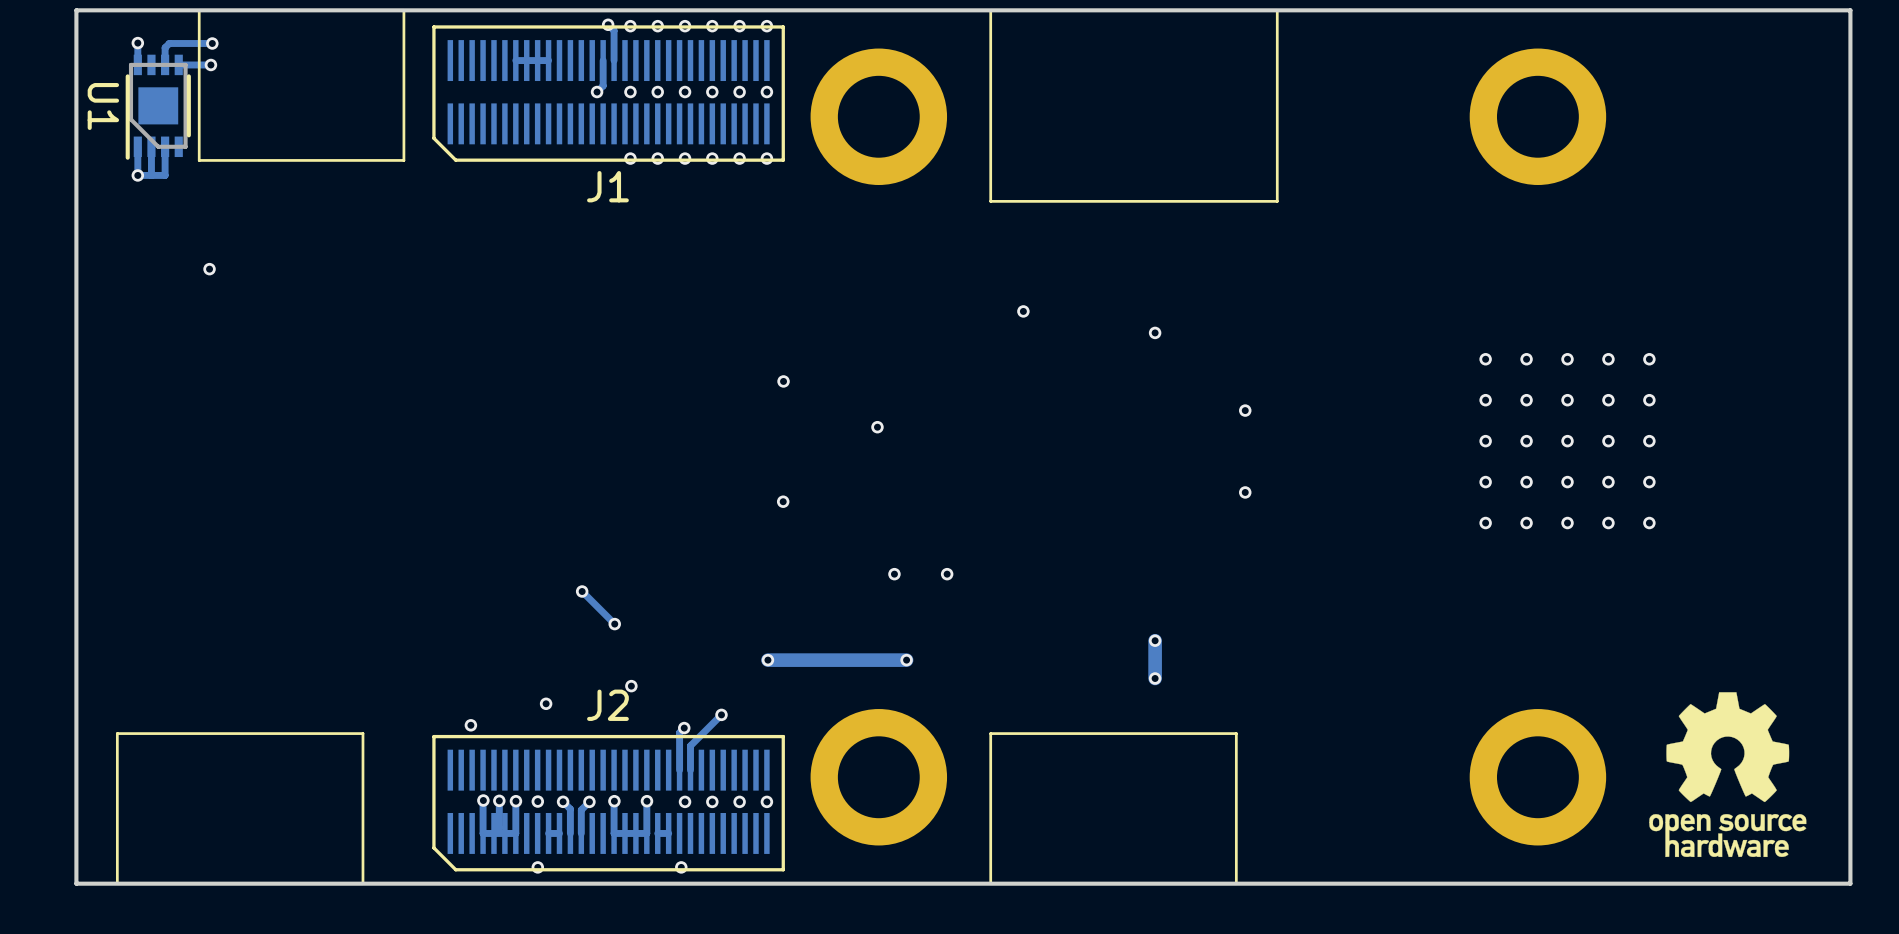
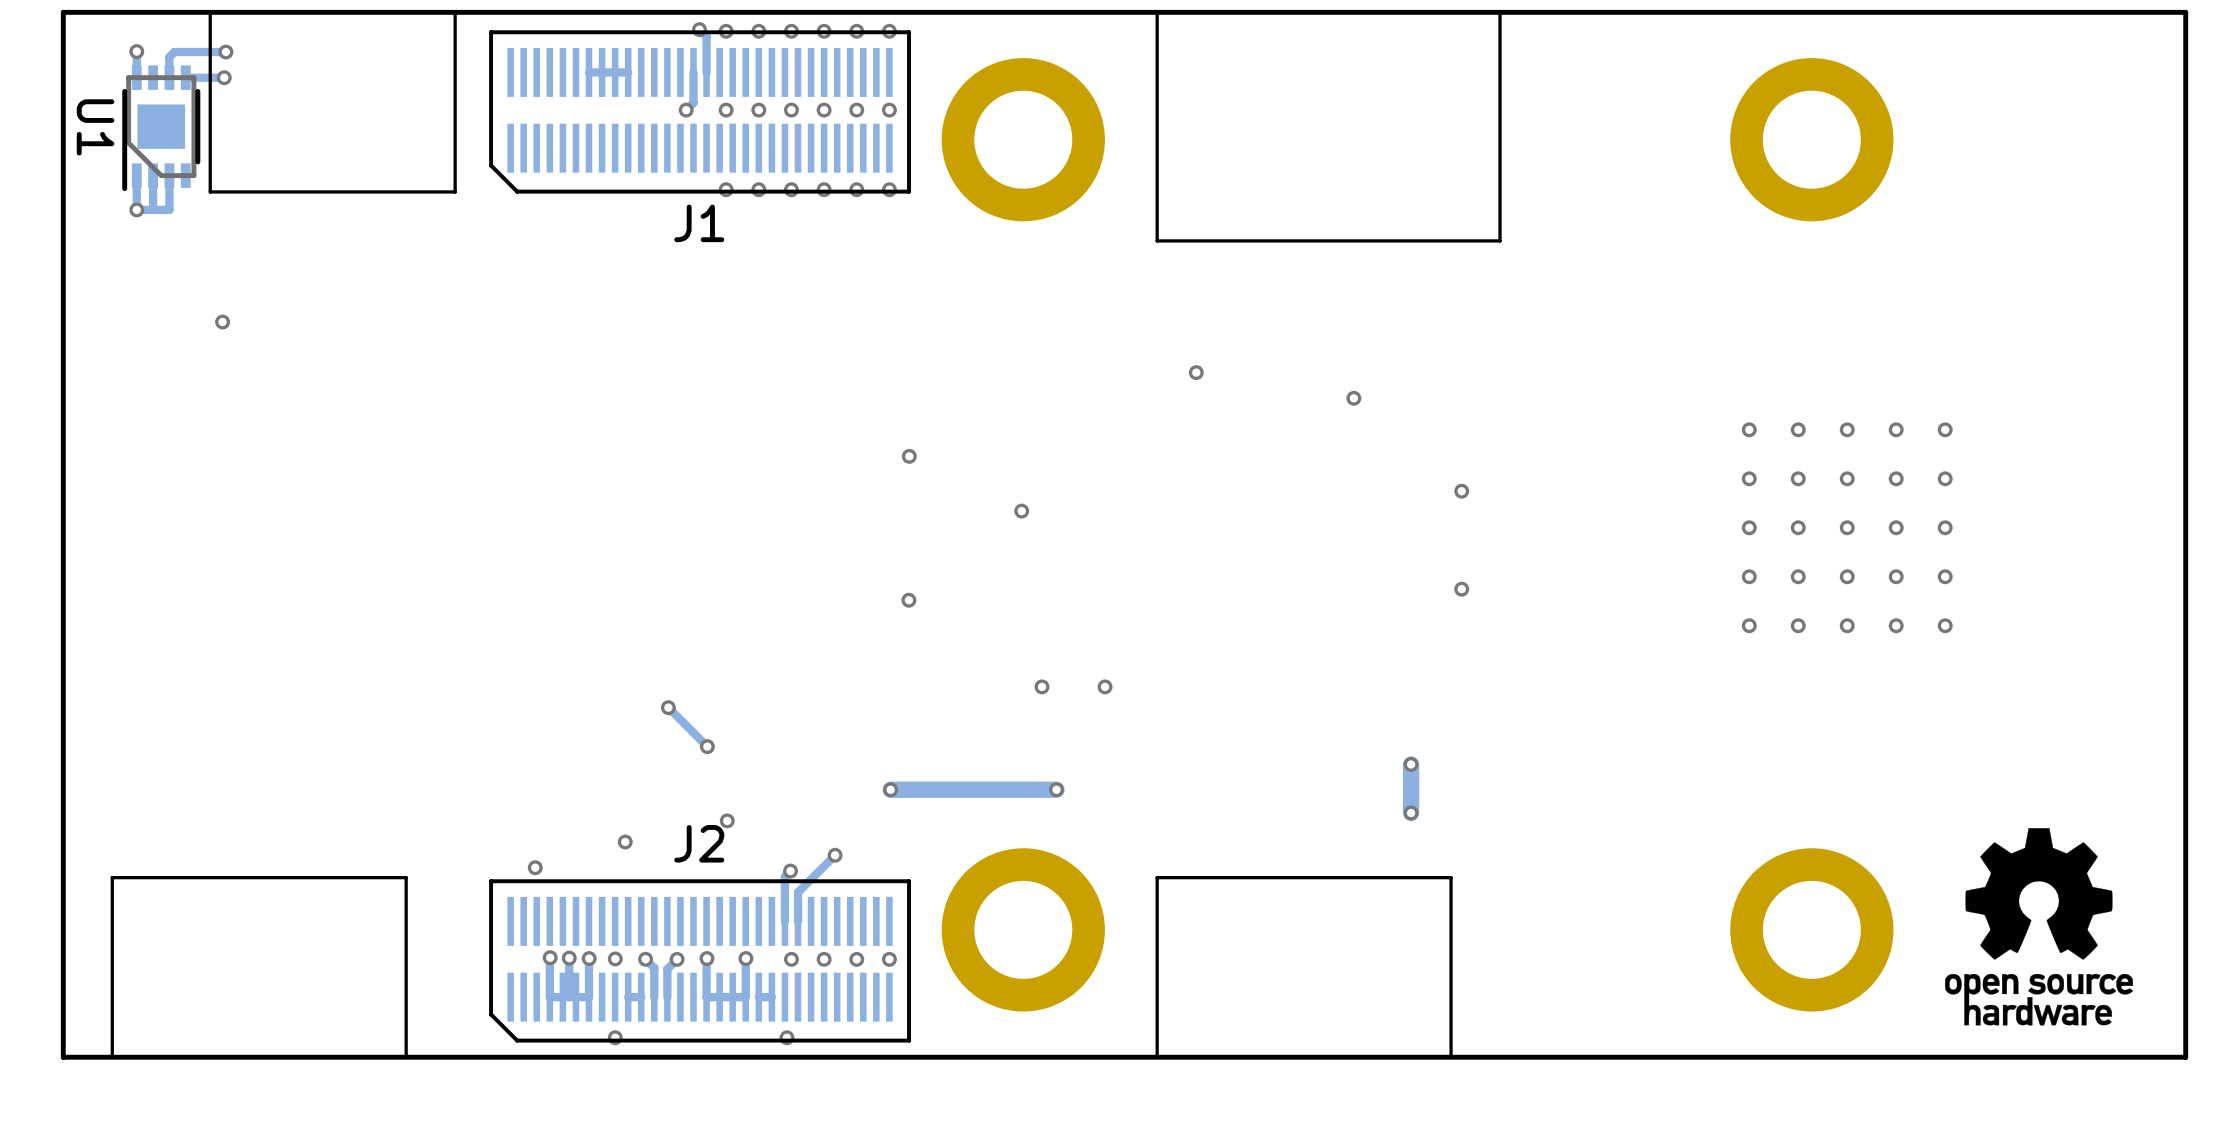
track: none -> (1411, 764) (1411, 812)
via: none -> (1411, 764)
track: (1155, 640) (1155, 678) -> none
via: (1155, 640) -> none
via: (1155, 678) -> none
via: none -> (1411, 812)

